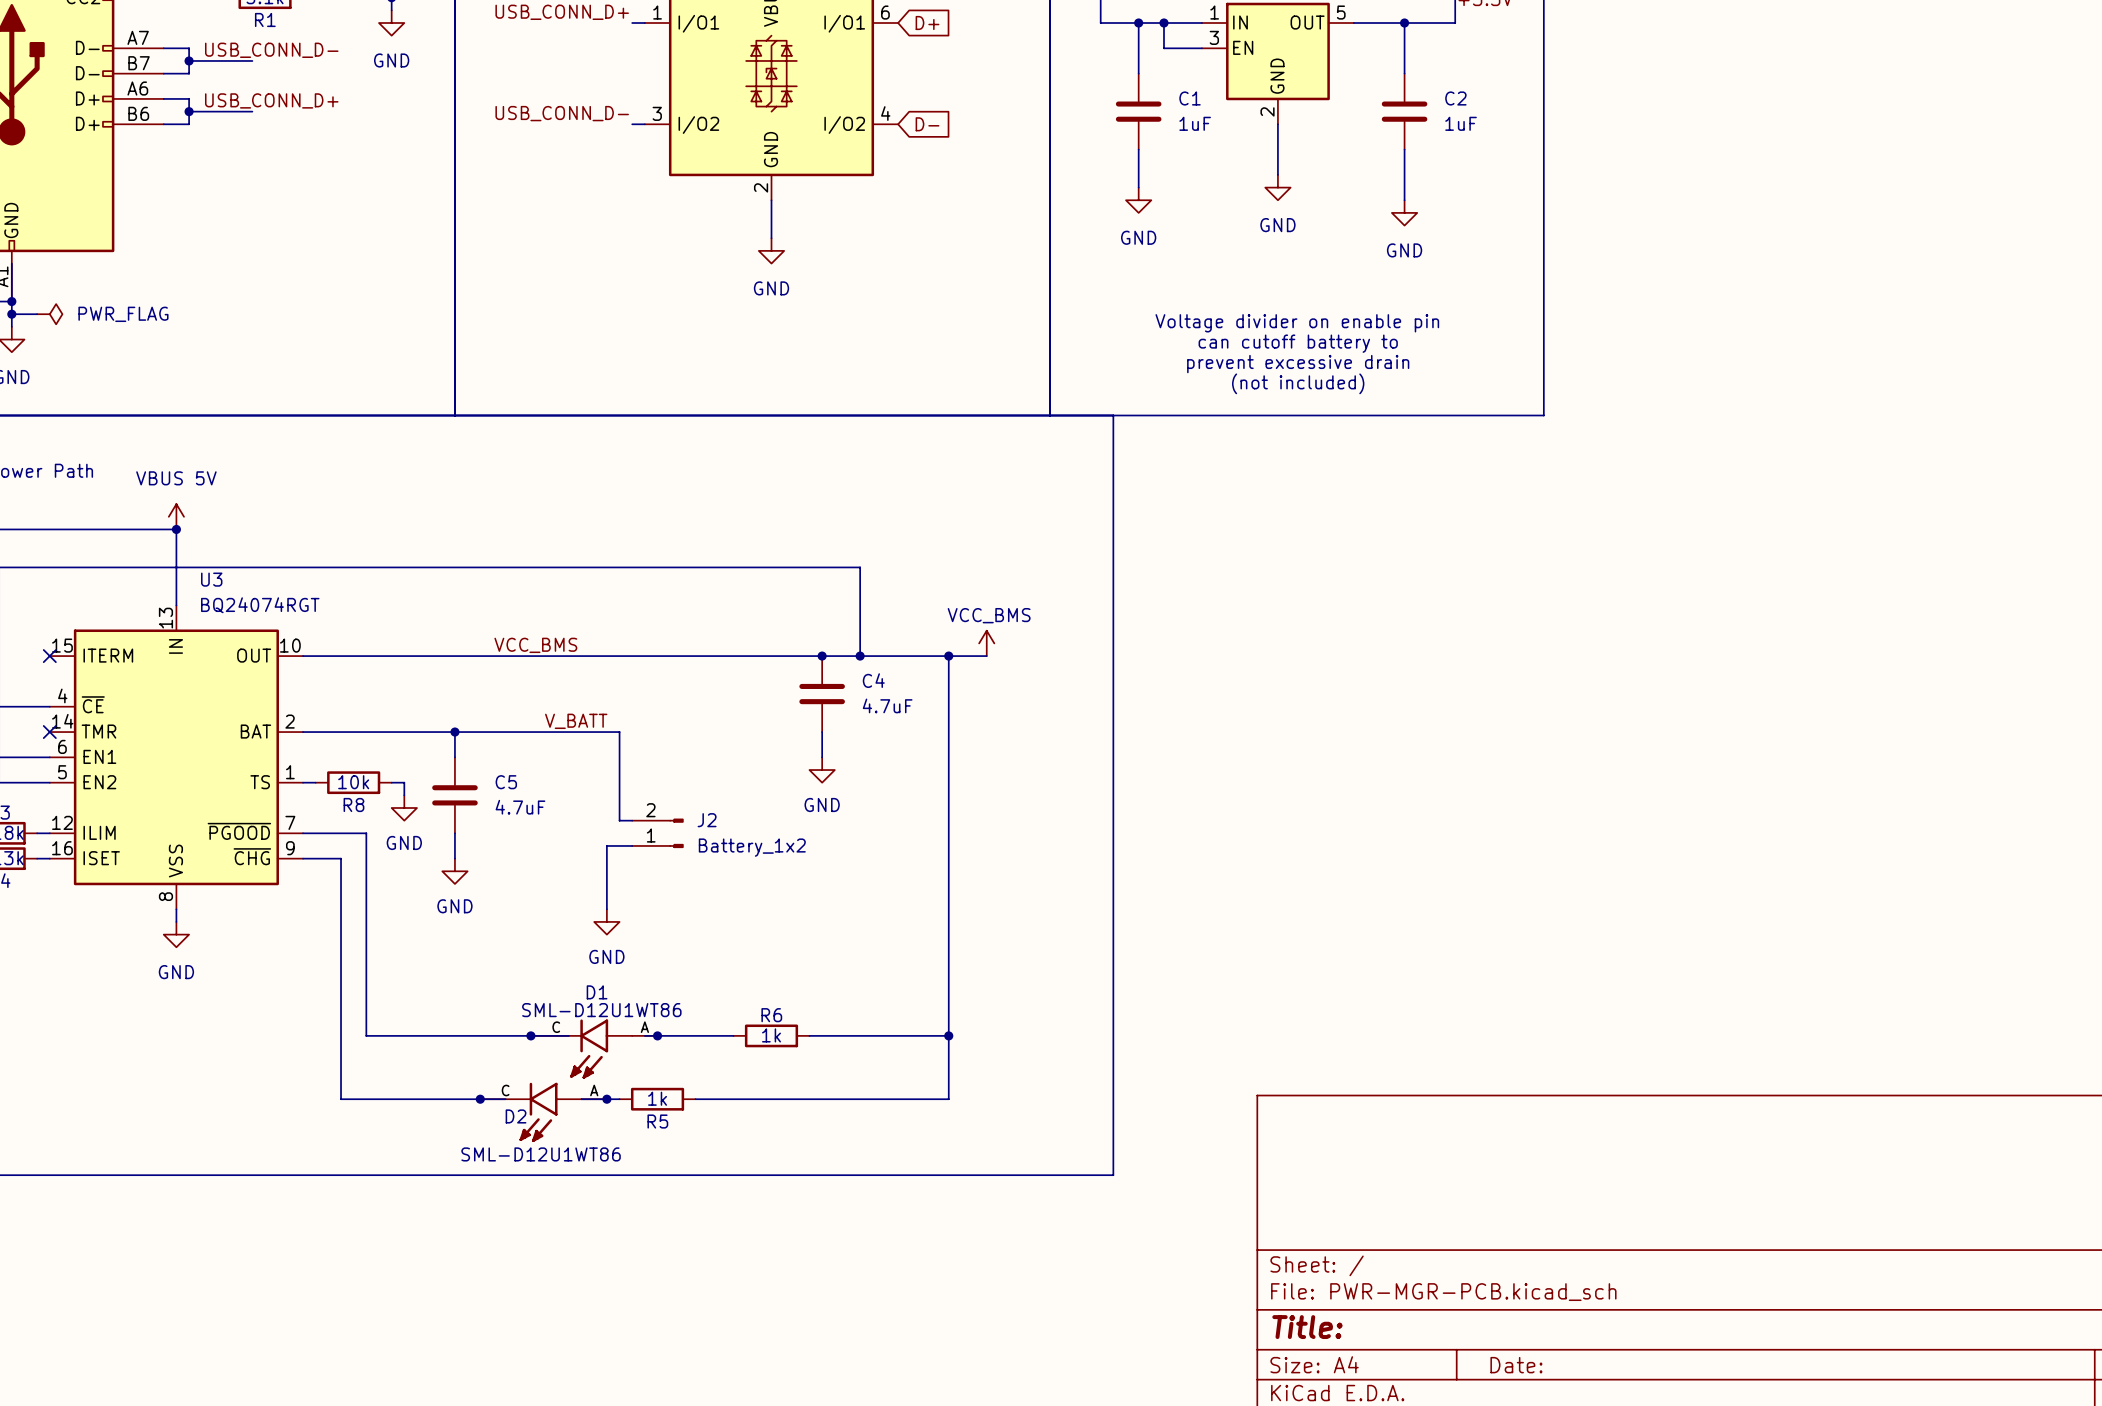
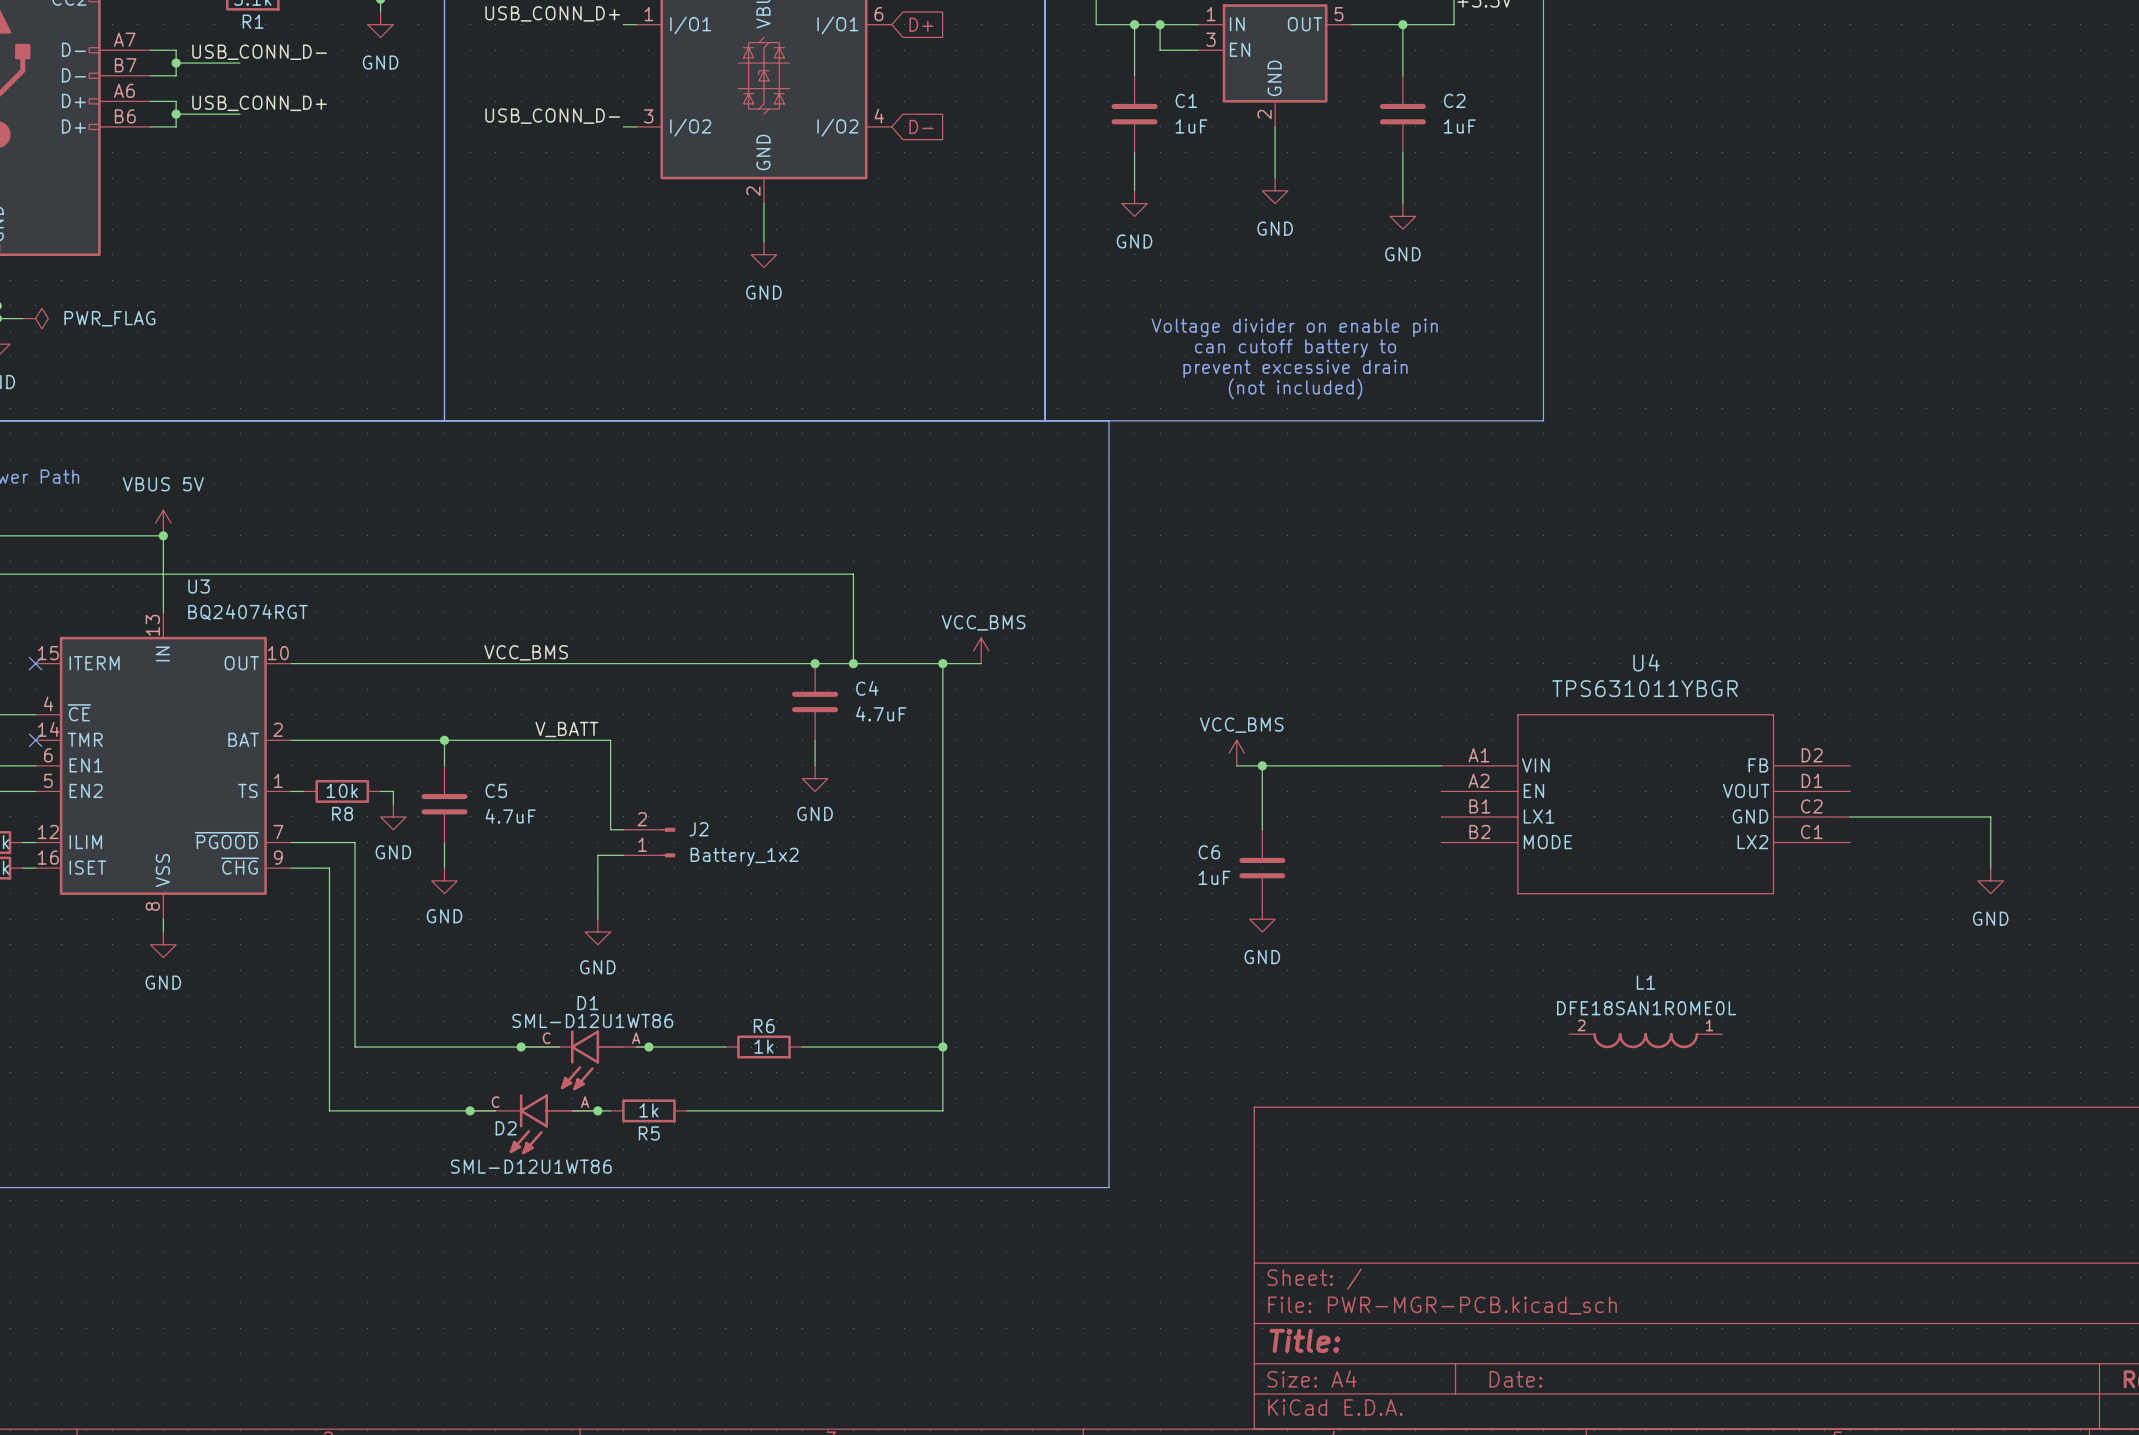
power symbol: none -> VCC_BMS (1236, 753)
wire: none -> (1236, 765) (1441, 765)
wire: none -> (1262, 765) (1262, 829)
junction: none -> (1262, 765)
U4: none -> TPS631011YBGR (1645, 804)
wire: none -> (1850, 816) (1990, 816) (1990, 868)
C6: none -> 1uF (1262, 868)
power symbol: none -> GND (1990, 880)
power symbol: none -> GND (1262, 919)
L1: none -> DFE18SAN1R0ME0L (1645, 1040)

